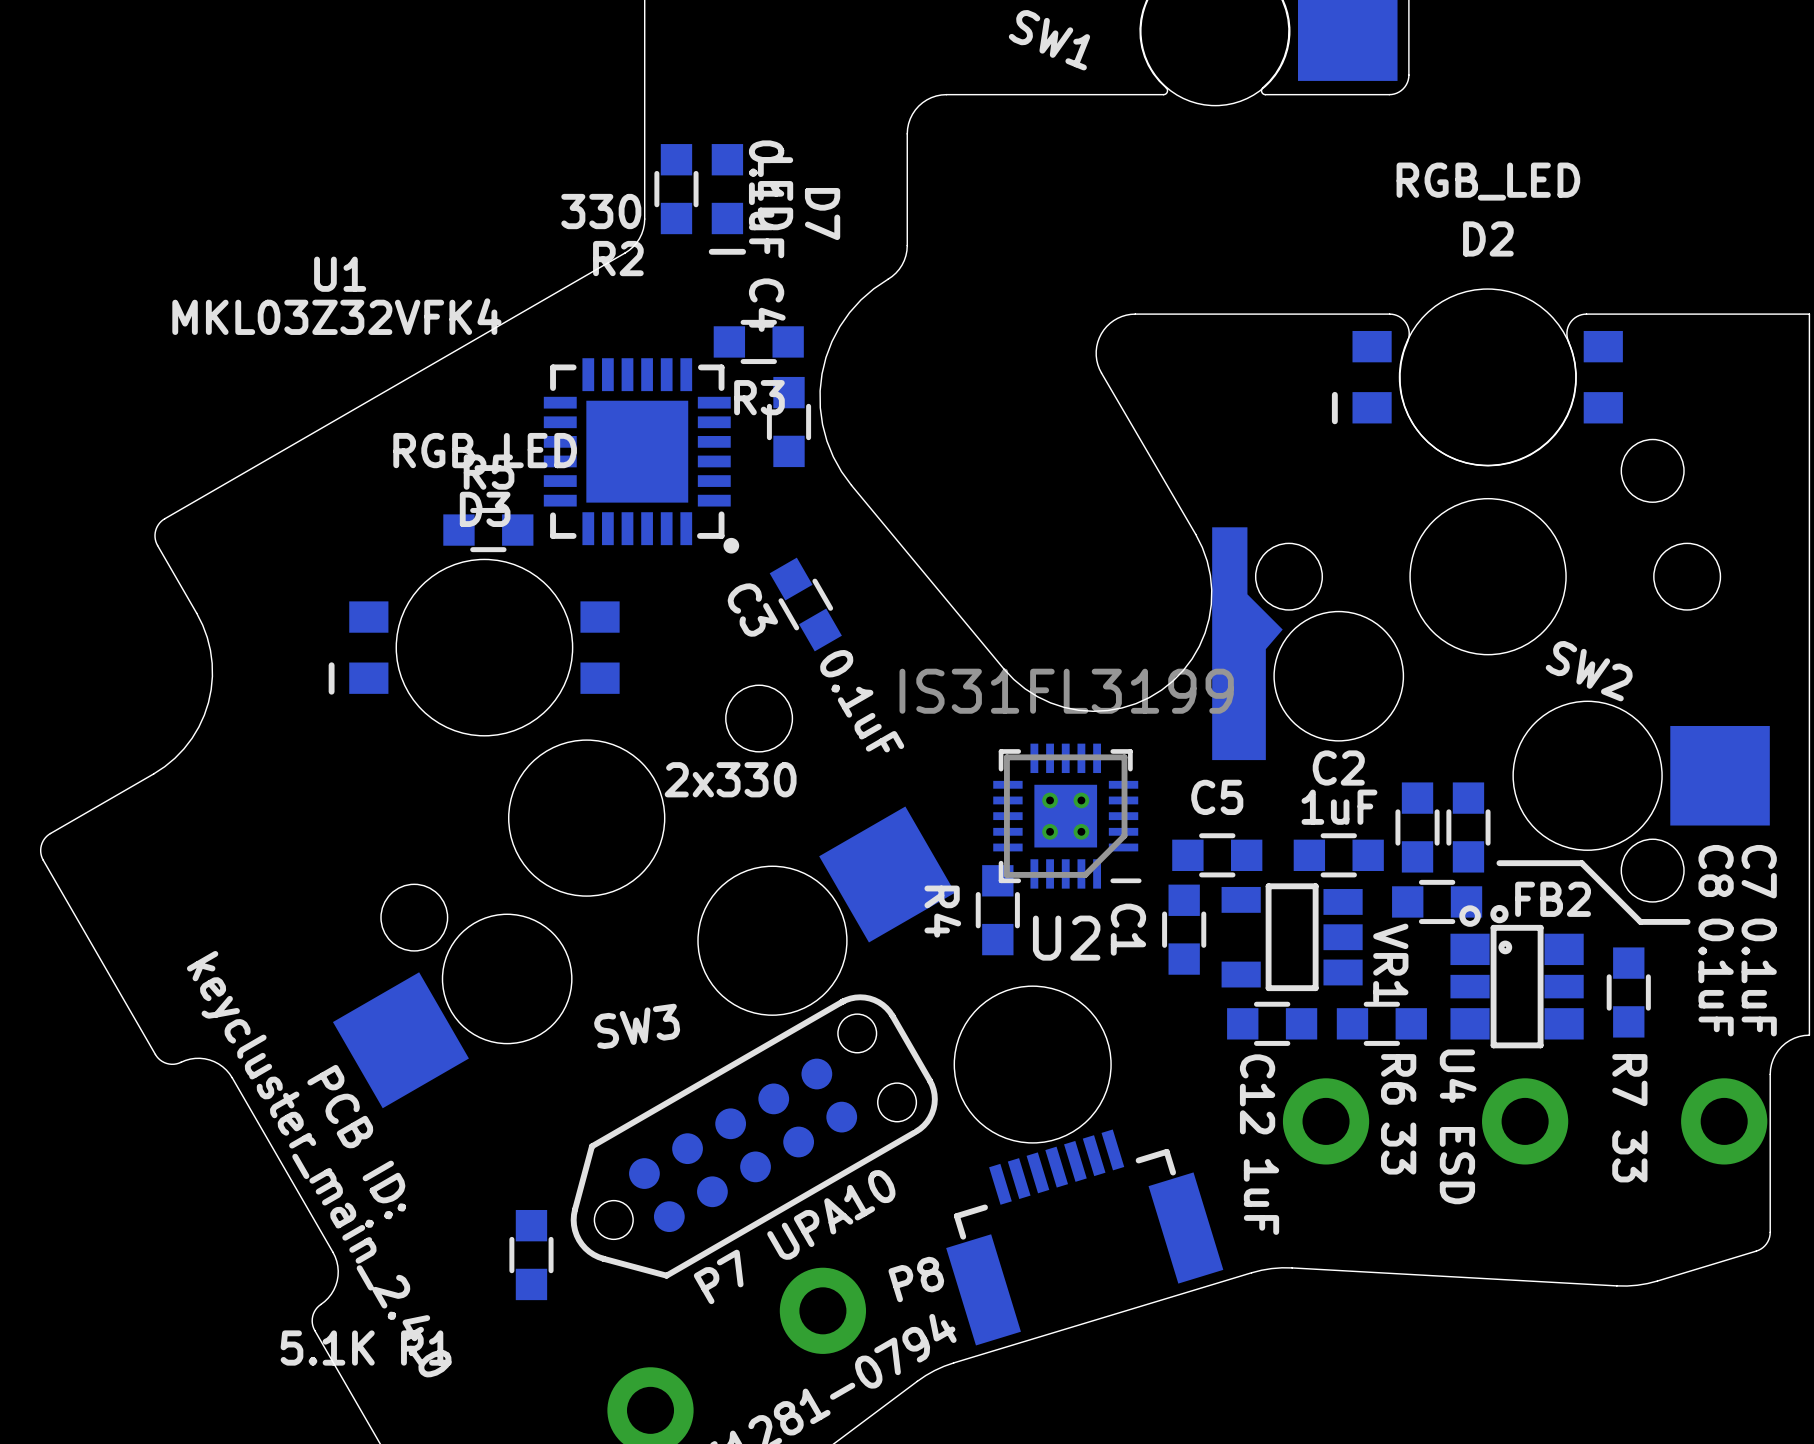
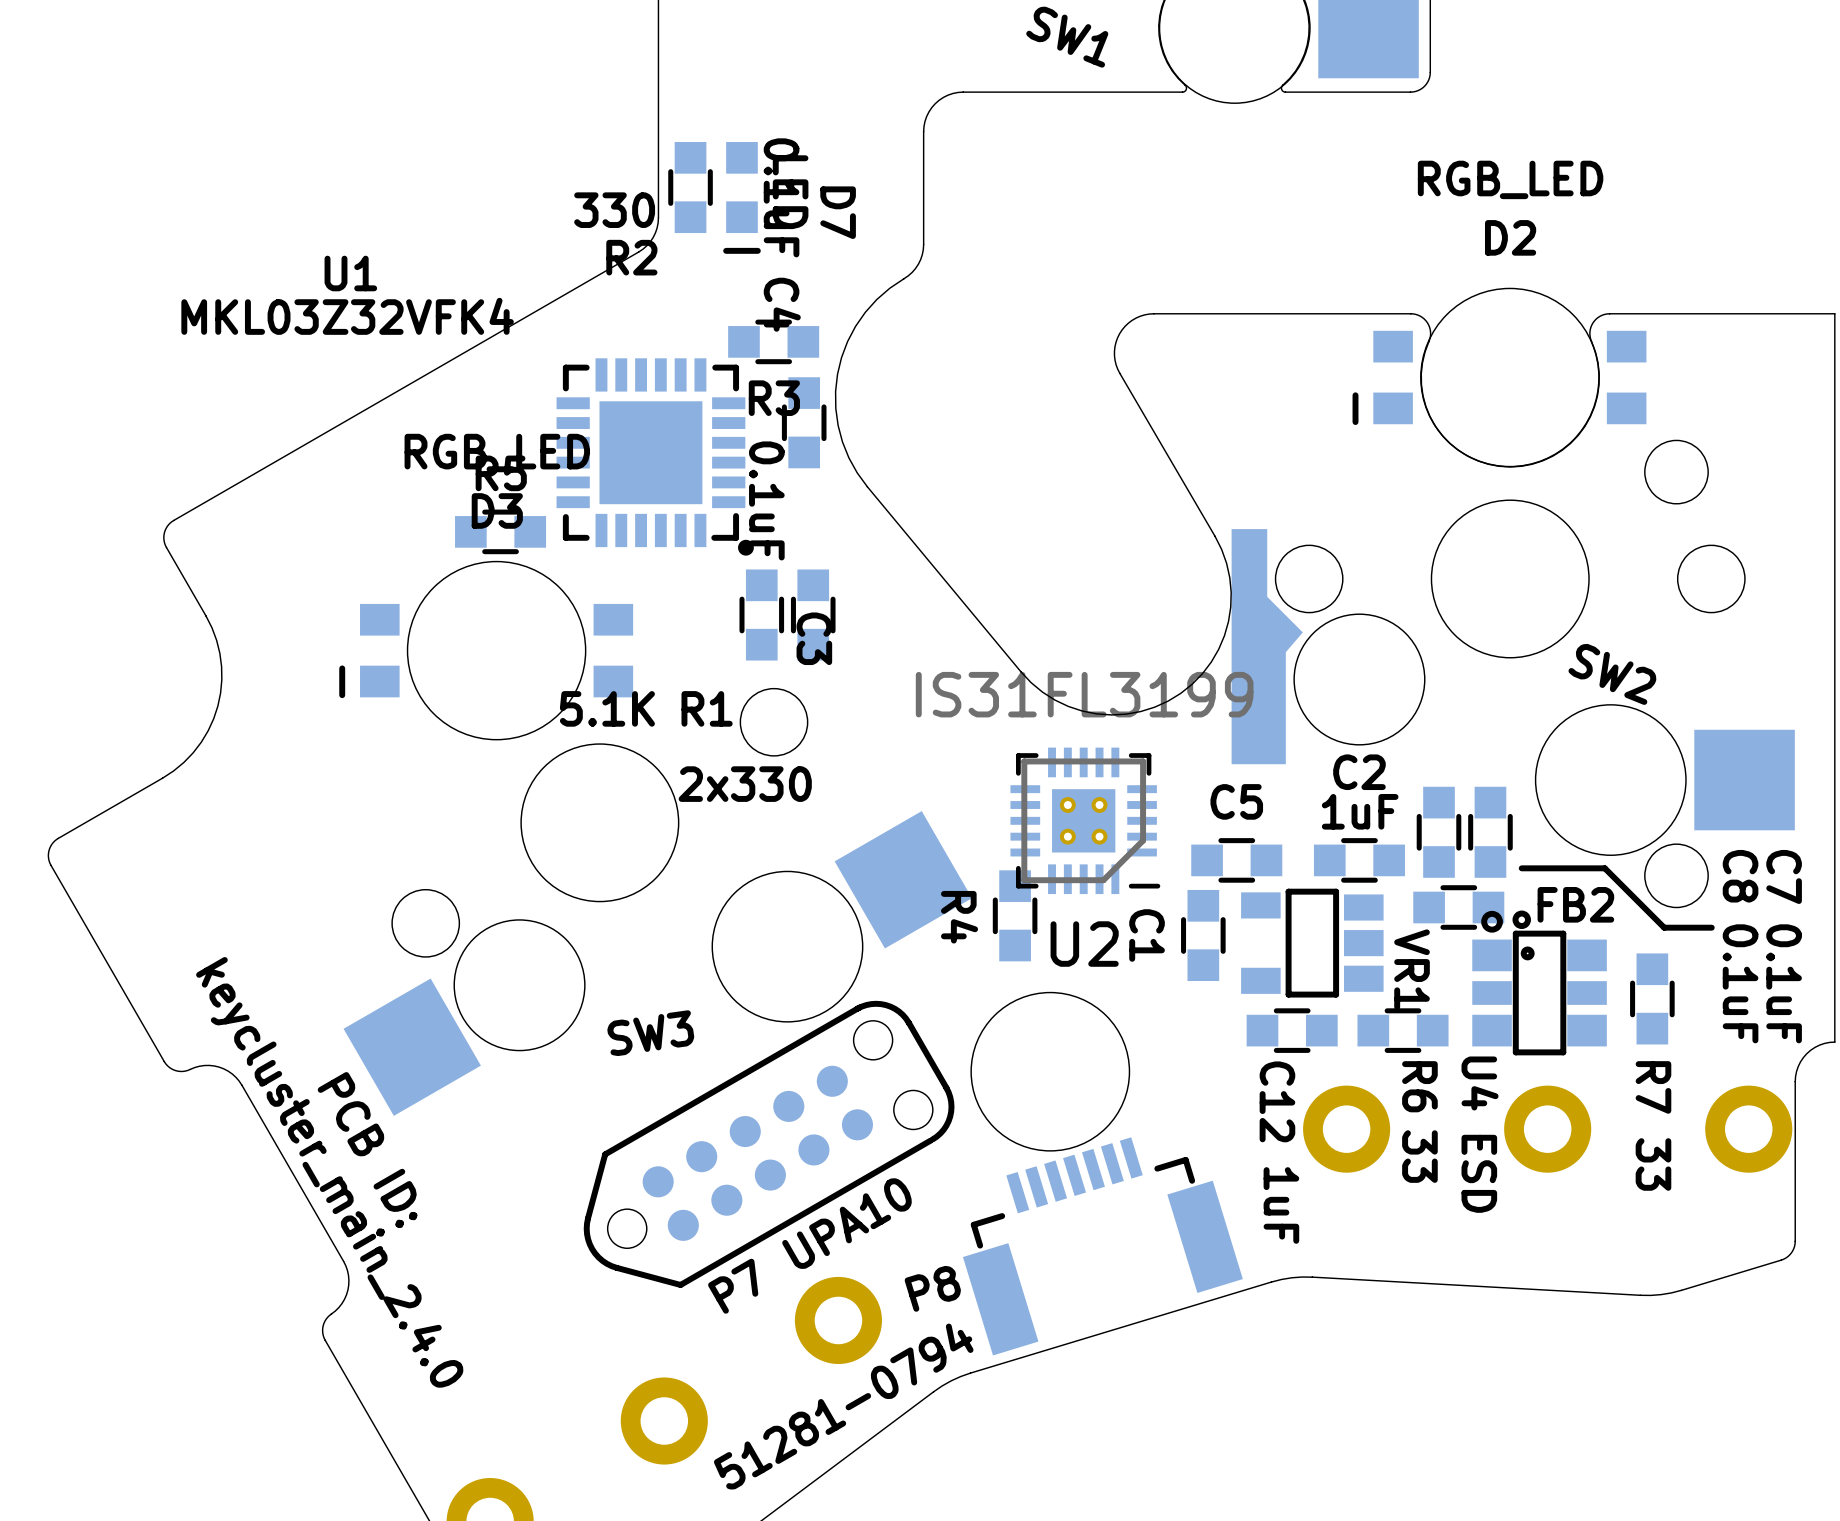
C3 rotation: 0° (805, 604) -> 30° clockwise (761, 615)
C3 position: (805, 604) -> (761, 615)
C3 name position: C3 (752, 610) -> C3 (814, 638)
C3 value position: 0.1uF (862, 701) -> 0.1uF (766, 500)
R1 position: (531, 1255) -> (813, 615)

